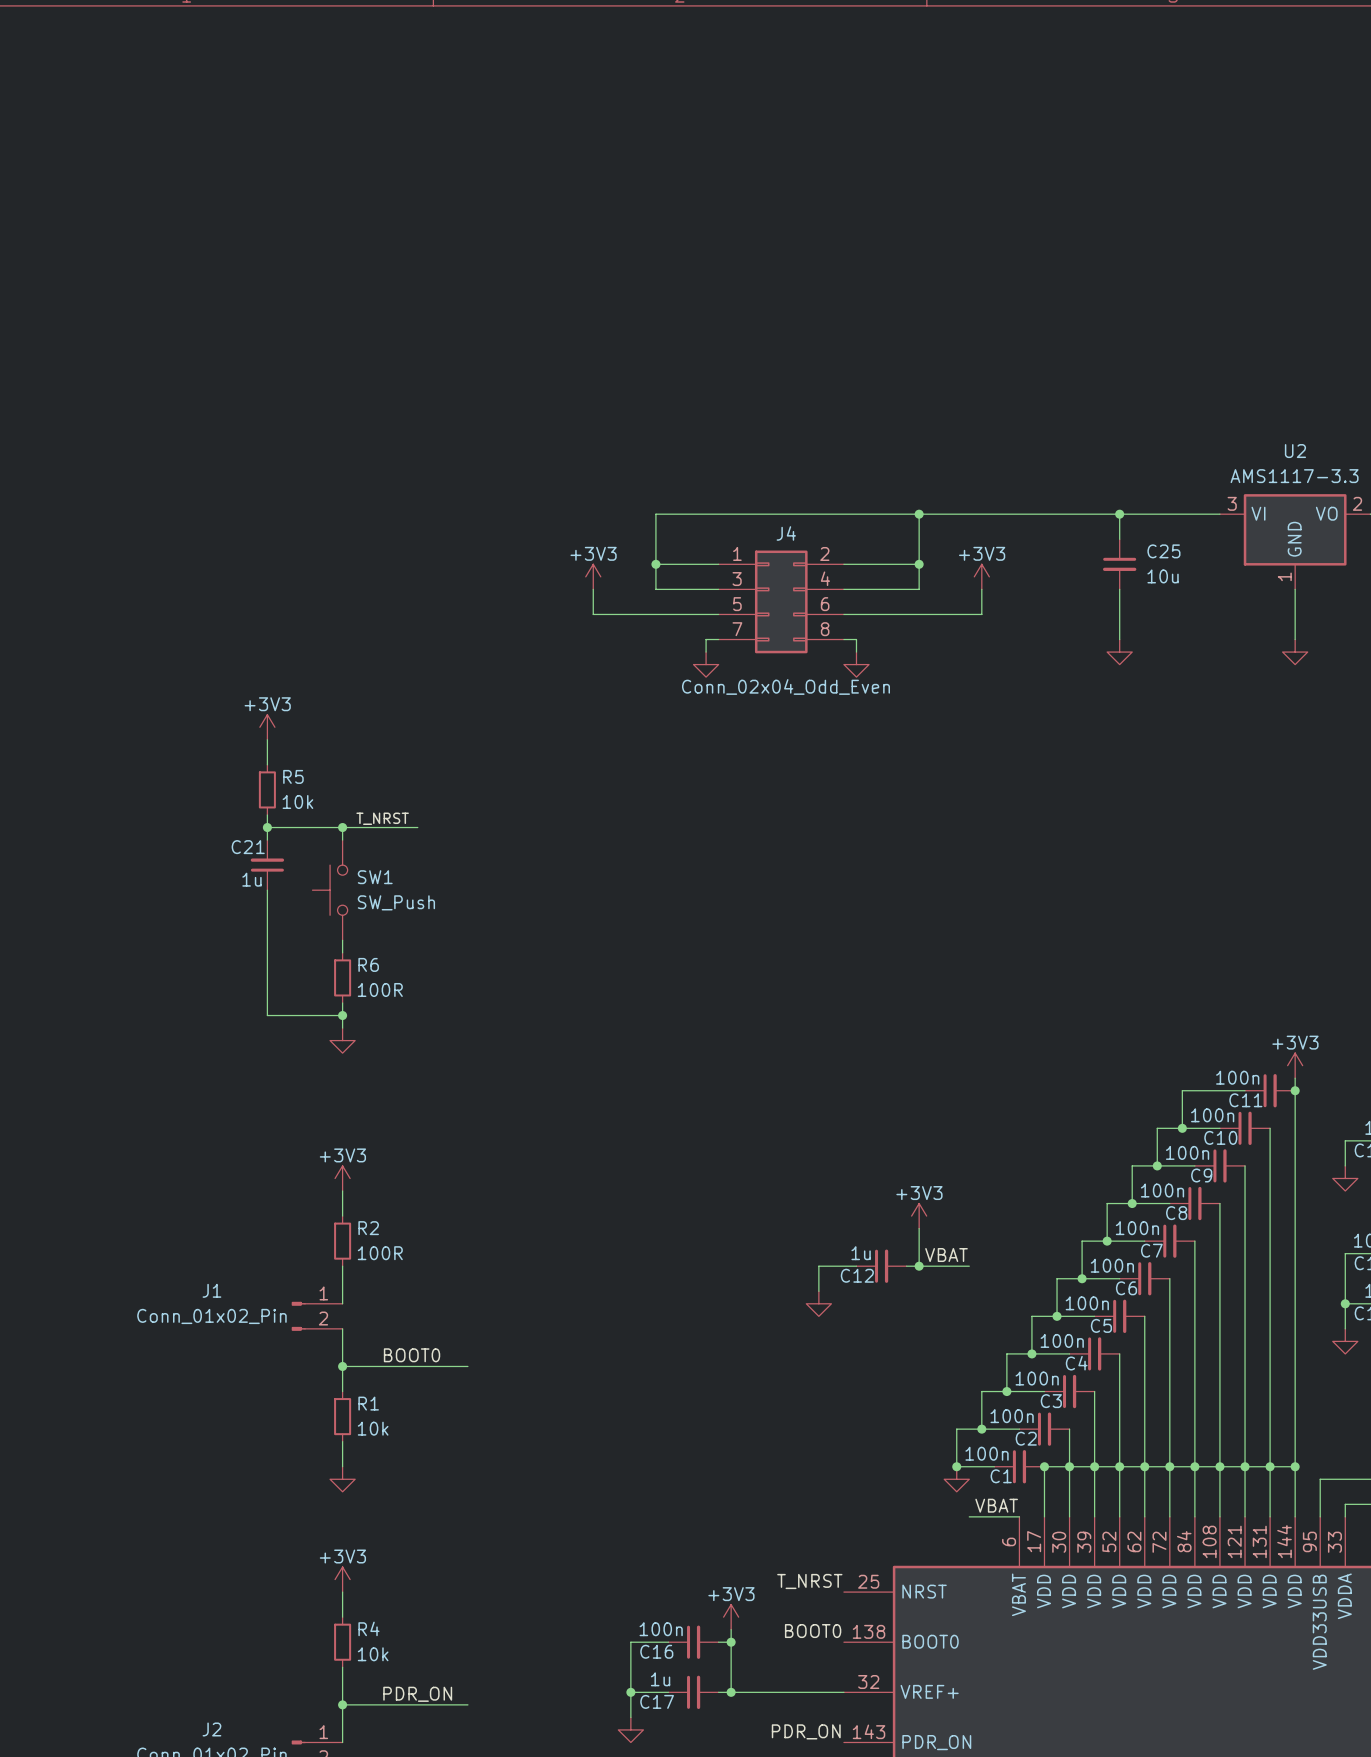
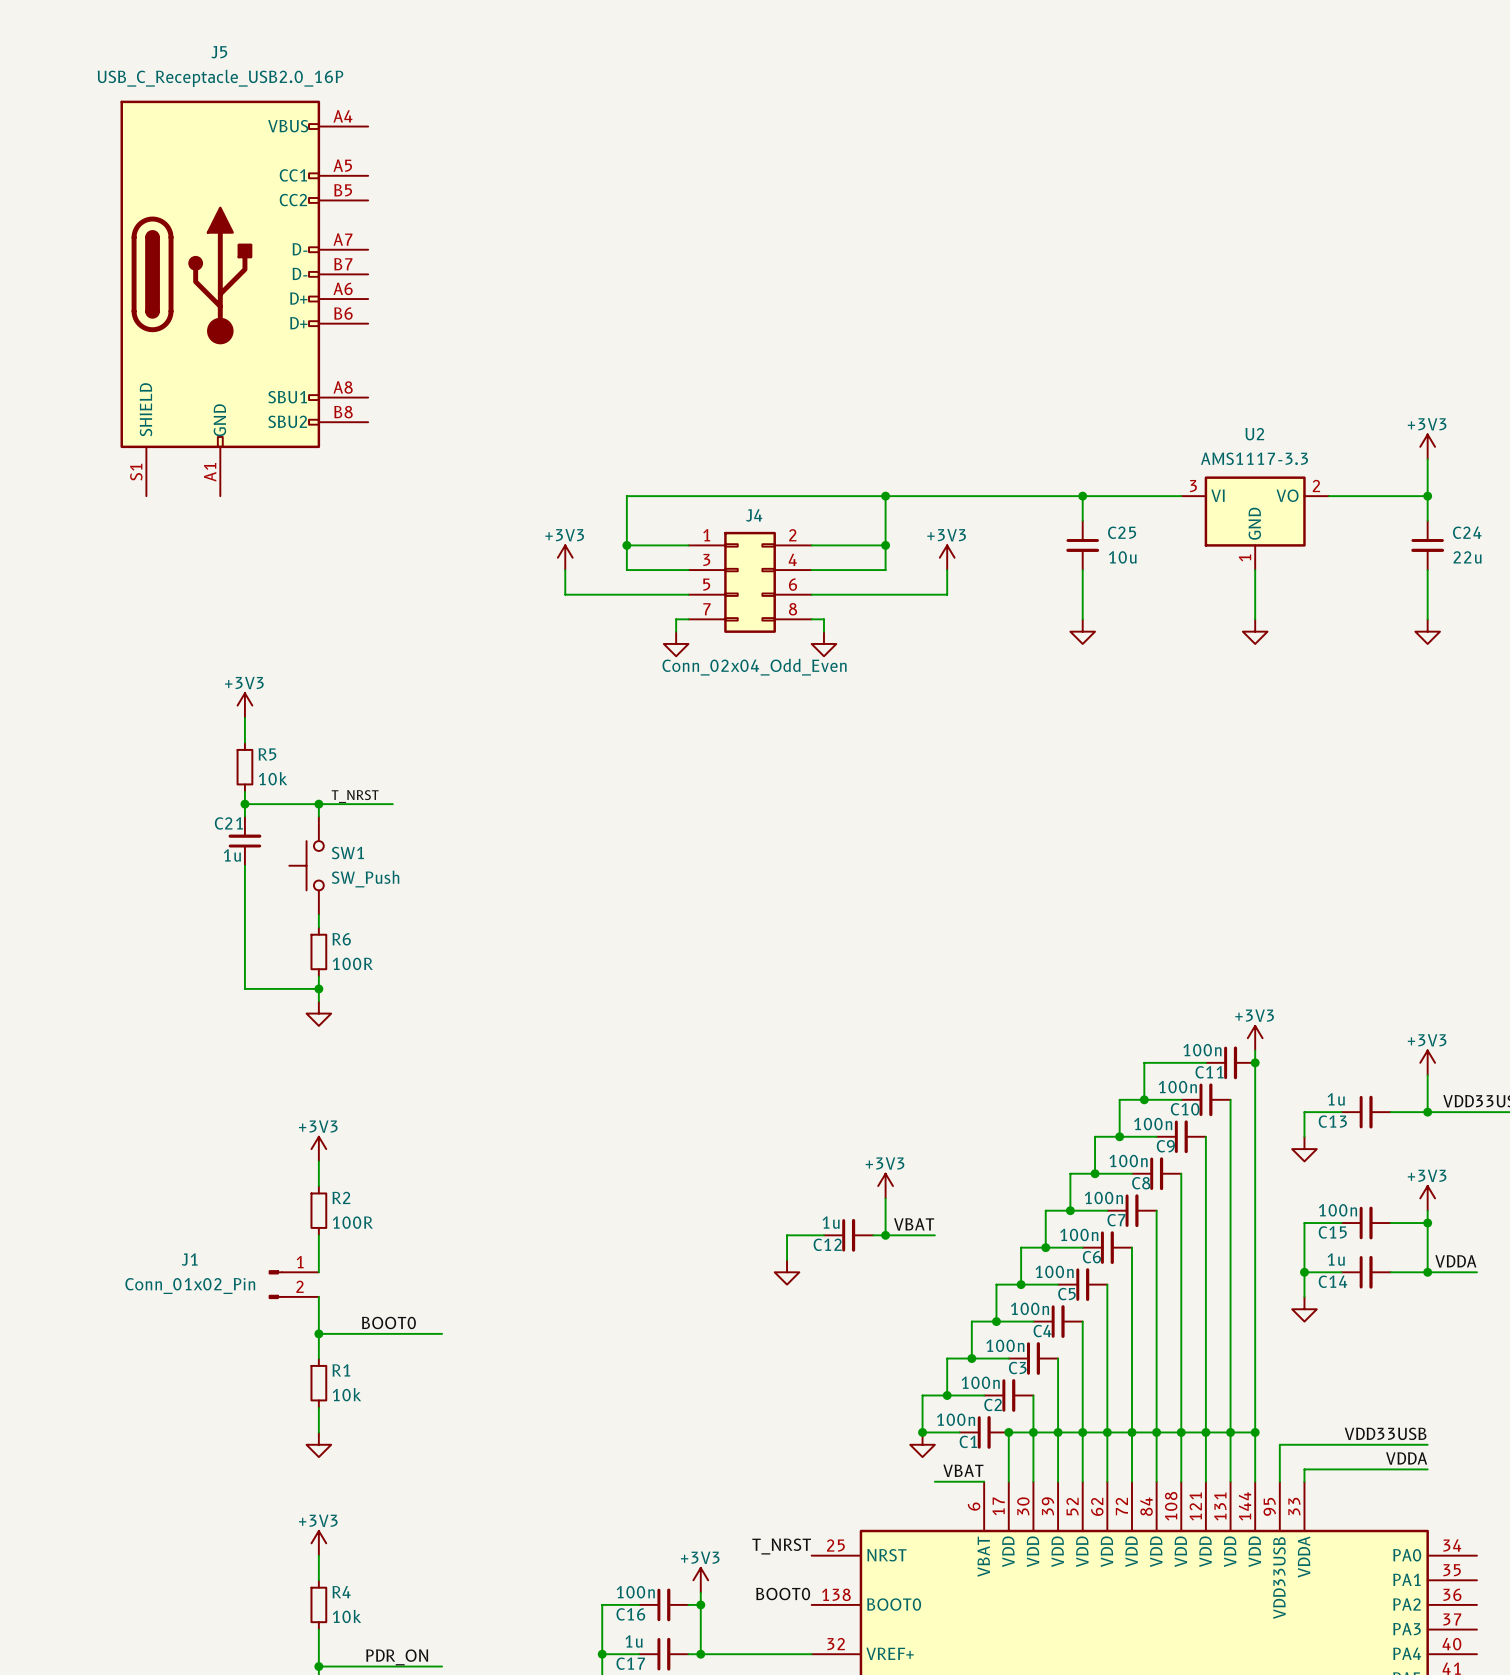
J5: none -> USB_C_Receptacle_USB2.0_16P (244, 298)

